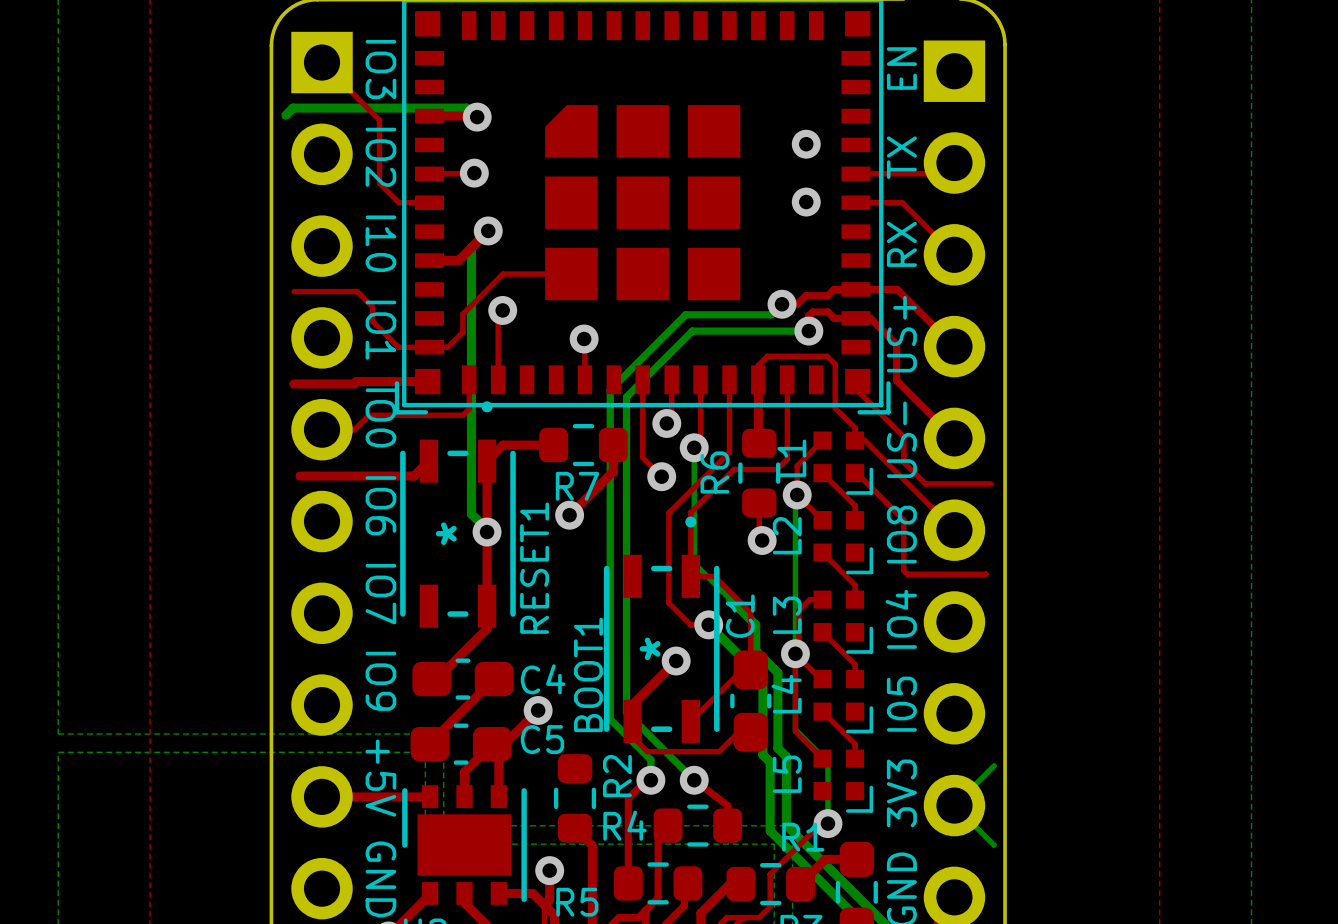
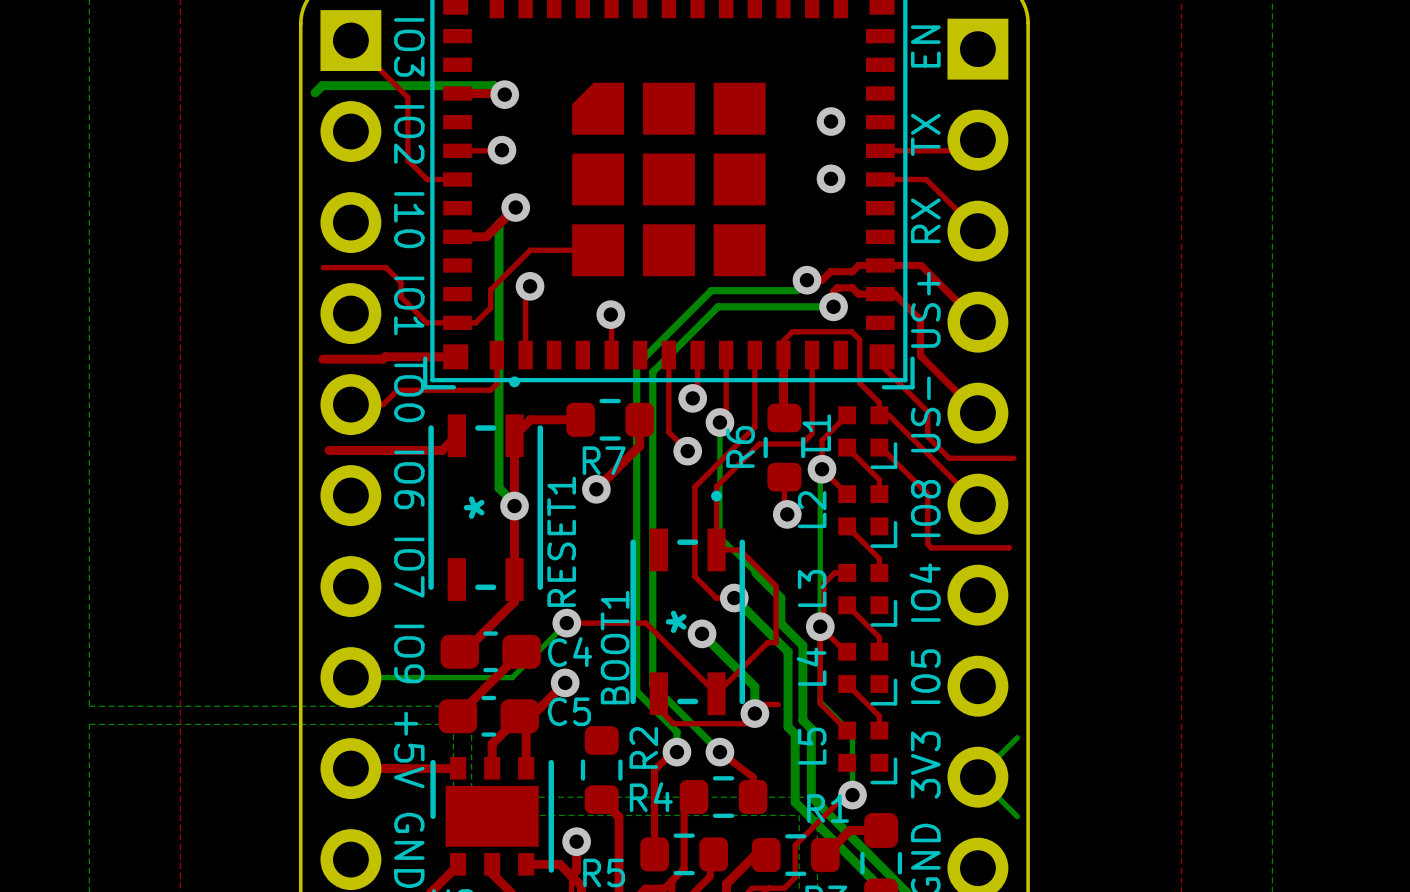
top track: none -> (566, 623) (645, 623) (716, 693)
bottom track: none -> (566, 623) (512, 677) (350, 677)
via: none -> (566, 623)
top track: (676, 661) (632, 704) (632, 721) -> none
bottom track: none -> (702, 633) (754, 686) (754, 713)
C1: (750, 701) -> none
via: none -> (754, 713)

